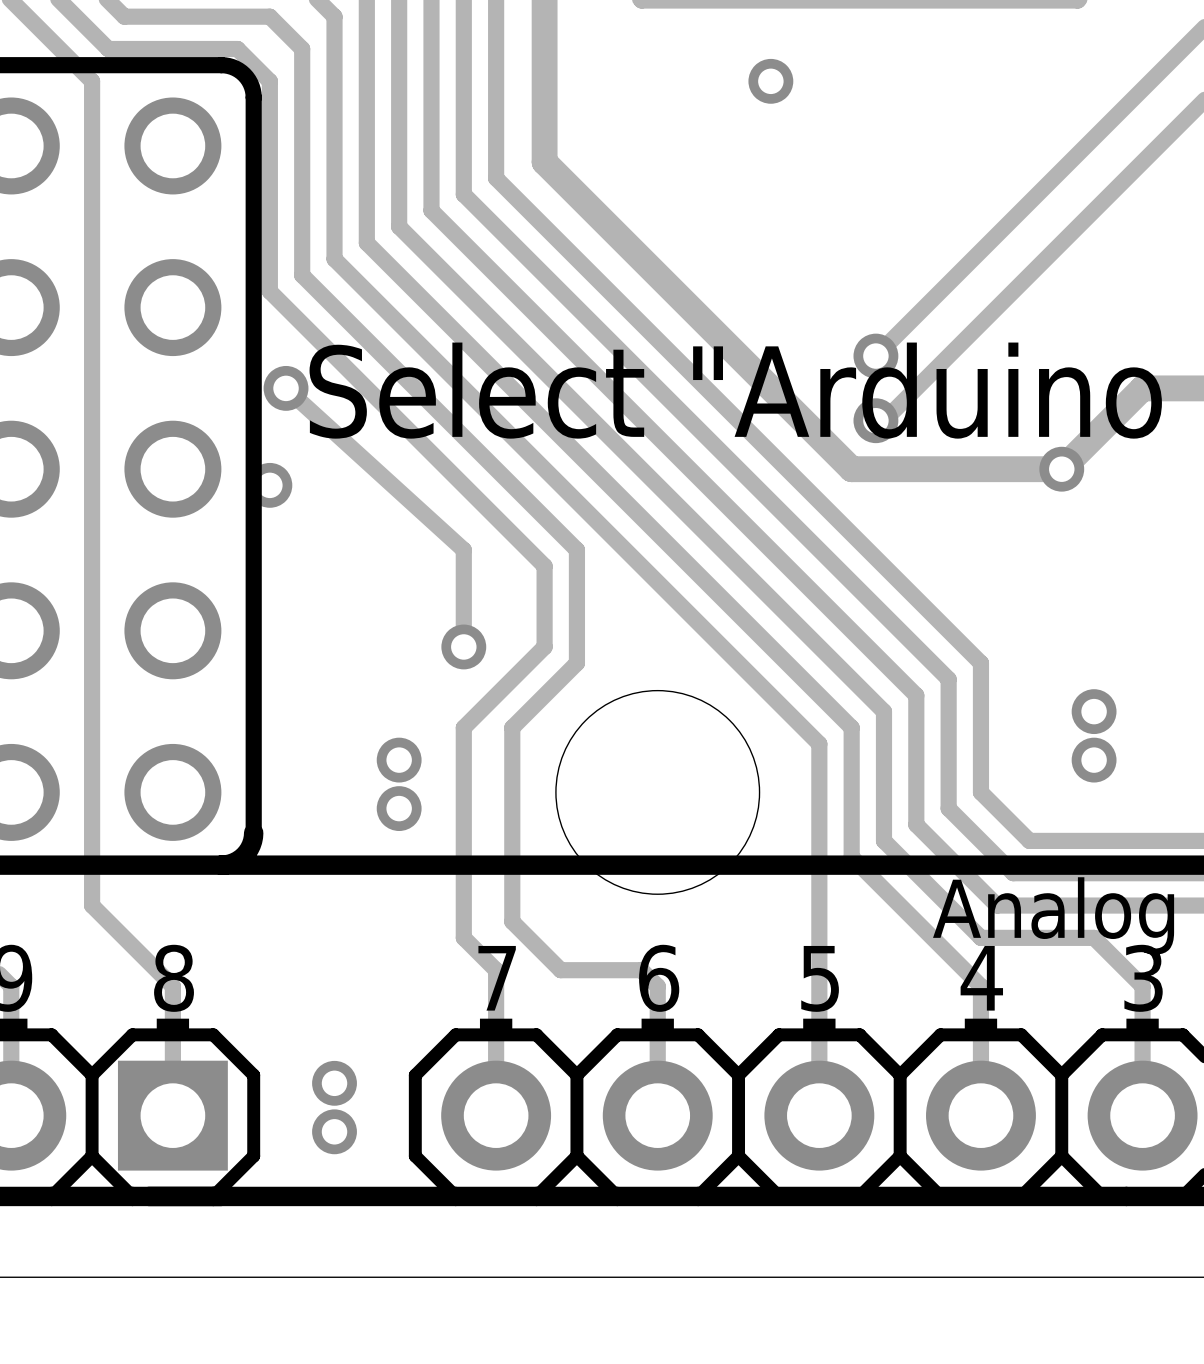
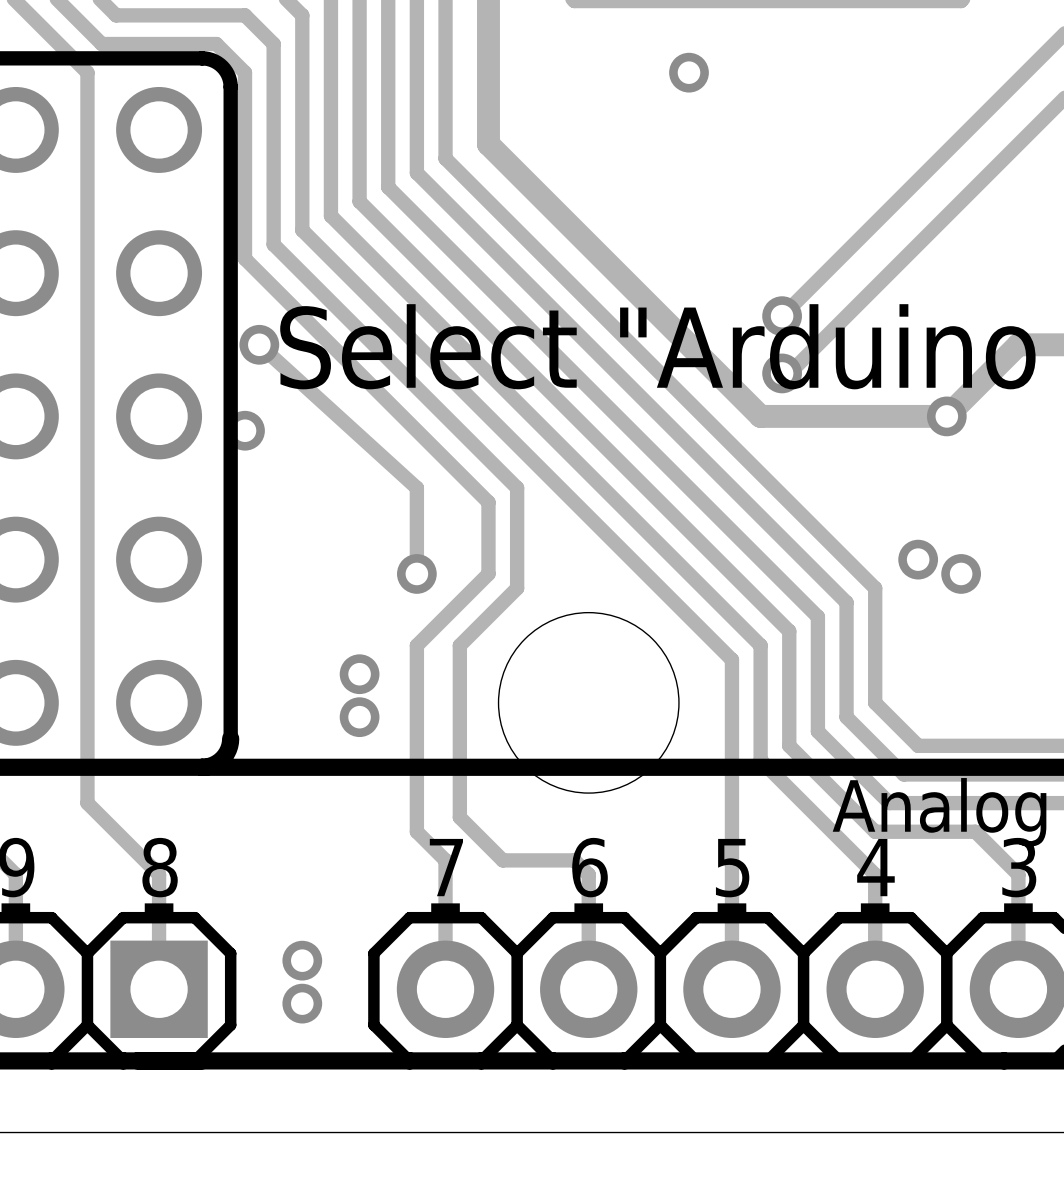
via: none -> (918, 559)
via: none -> (961, 573)
via: (1094, 711) -> none
via: (1094, 760) -> none

